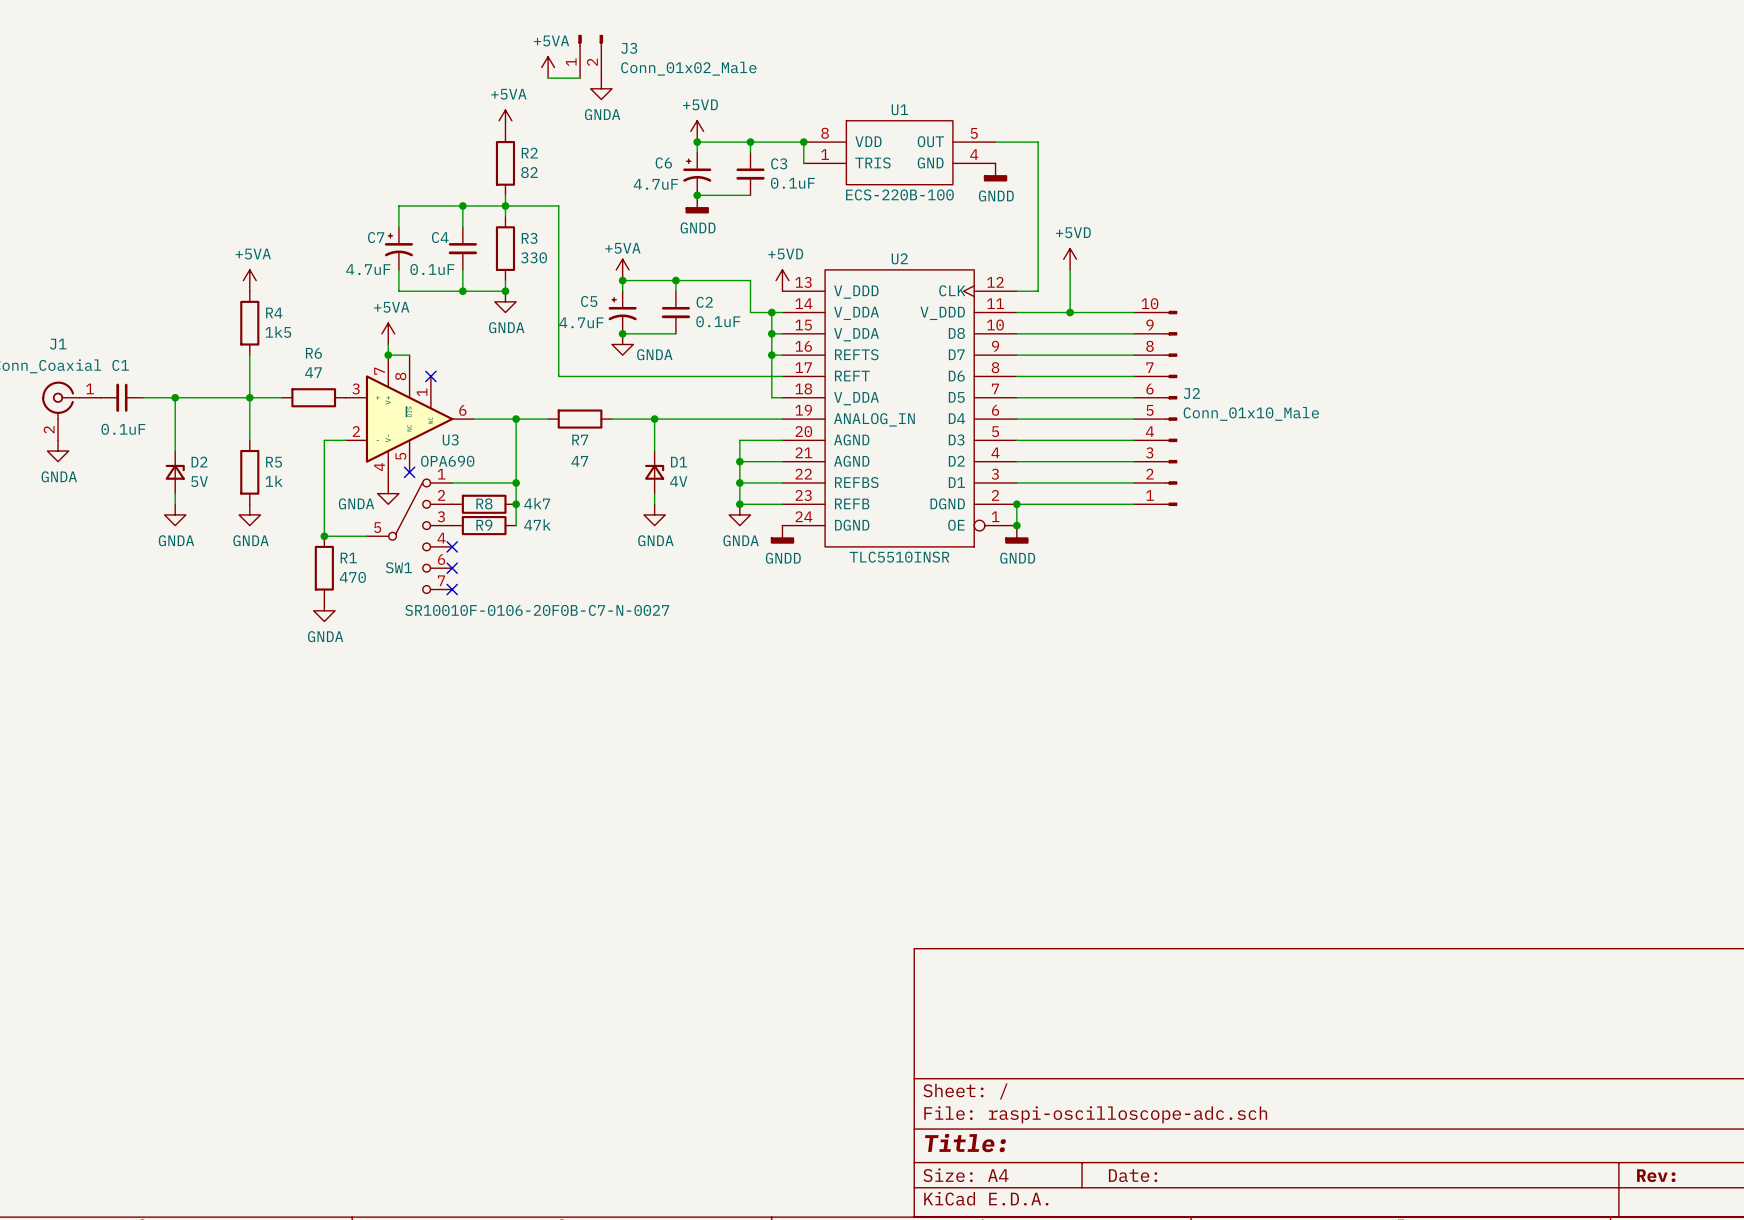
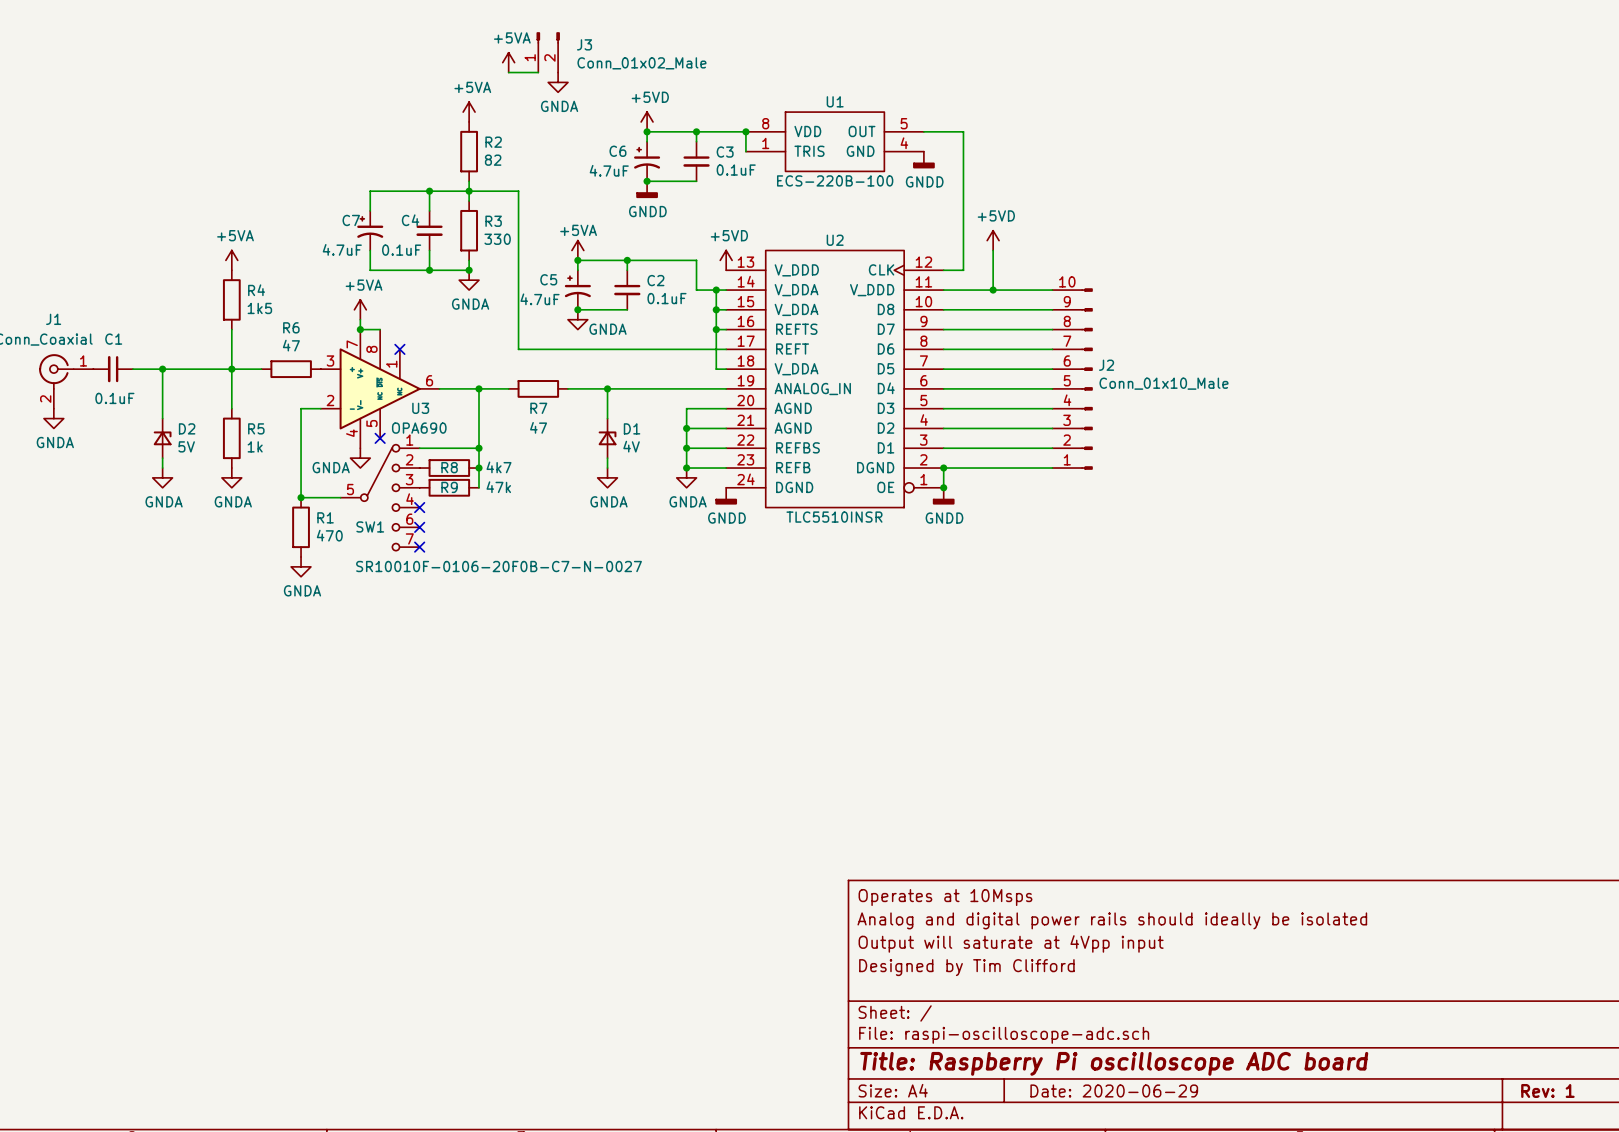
title block: none -> Operates at 10Msps (945, 897)
title block: none -> Analog and digital power rails should ideally be isolated (1112, 920)
title block: none -> Output will saturate at 4Vpp input (1011, 943)
title block: none -> Designed by Tim Clifford (966, 967)
title block: Title: (965, 1143) -> Title: Raspberry Pi oscilloscope ADC board (1114, 1063)
title block: Date: (1133, 1175) -> Date: 2020-06-29 (1114, 1090)
title block: Rev: (1656, 1175) -> Rev: 1 (1547, 1090)

